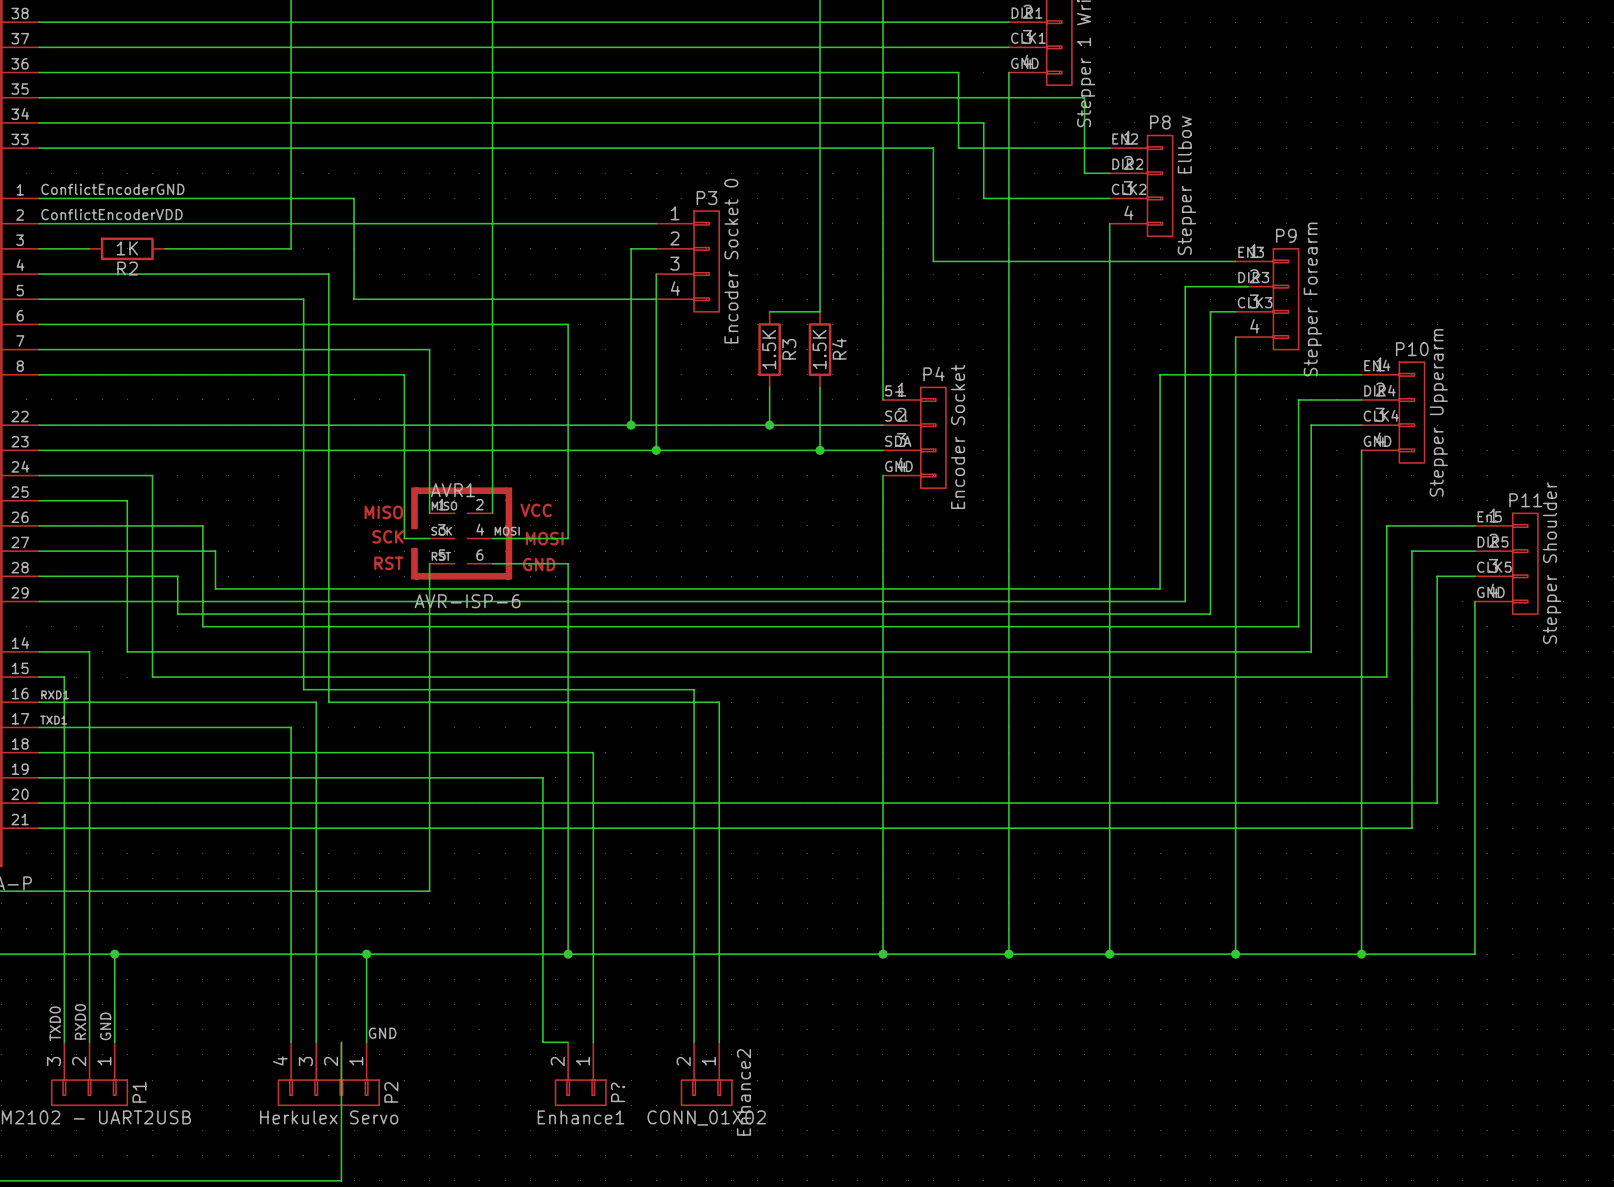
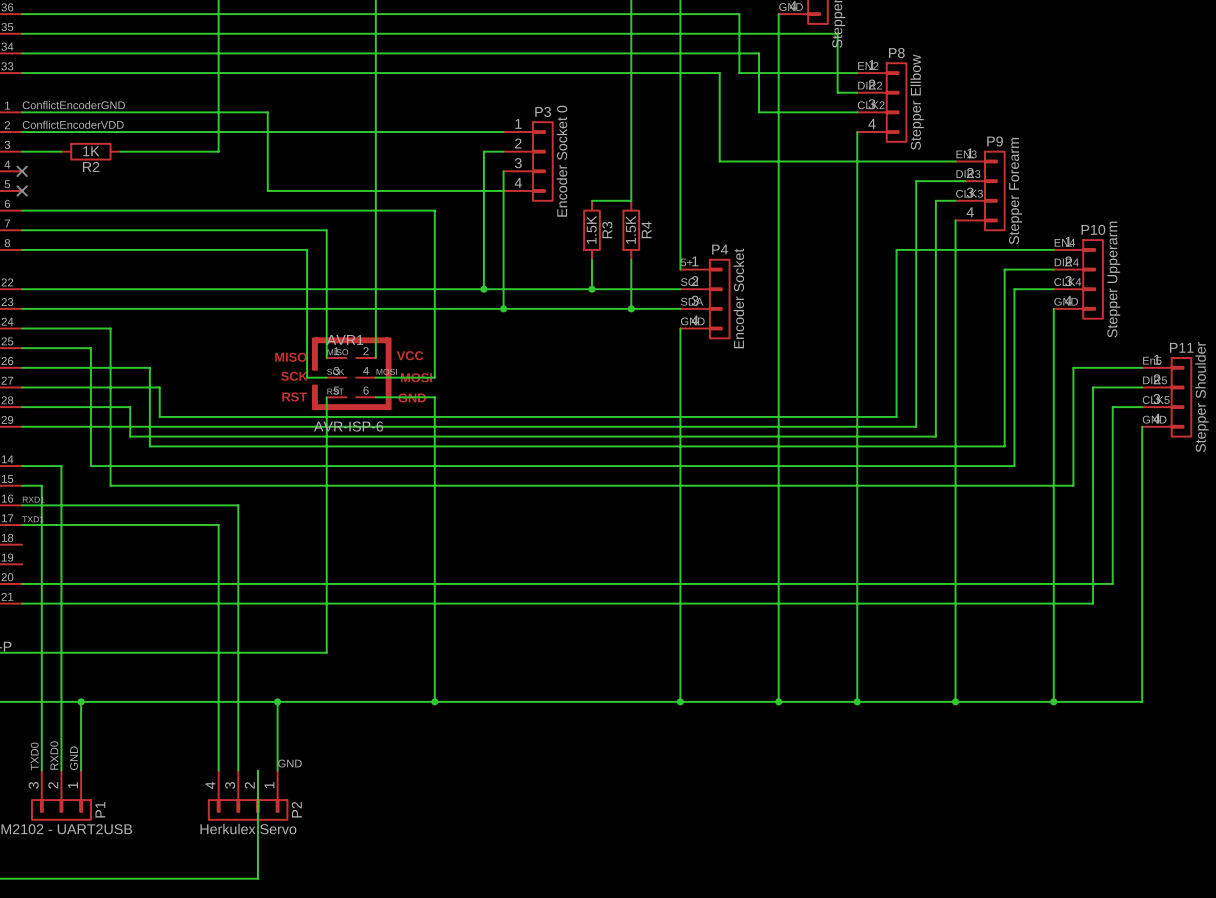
wire: (39, 274) (328, 274) (328, 702) (719, 702) (719, 1042) -> none
no-connect mark: none -> (22, 171)
wire: (39, 299) (303, 299) (303, 689) (694, 689) (694, 1042) -> none
no-connect mark: none -> (22, 190)
wire: (39, 752) (593, 752) (593, 1042) -> none
wire: (39, 777) (542, 777) (542, 1042) (568, 1042) -> none
P?: Enhance1 (580, 1073) -> none
Enhance2: CONN_01X02 (706, 1073) -> none

